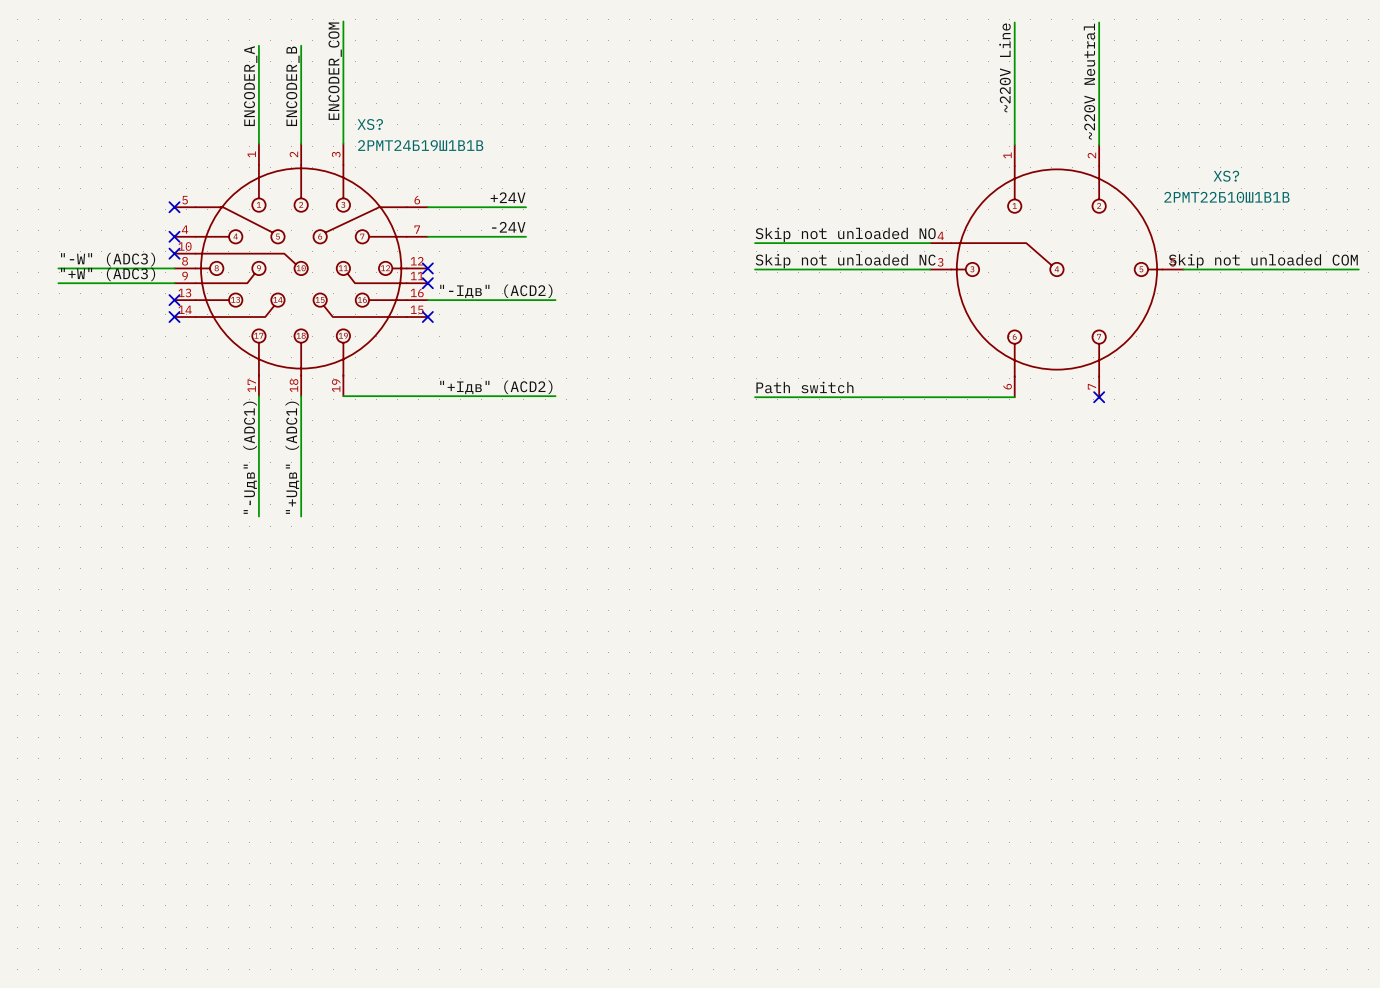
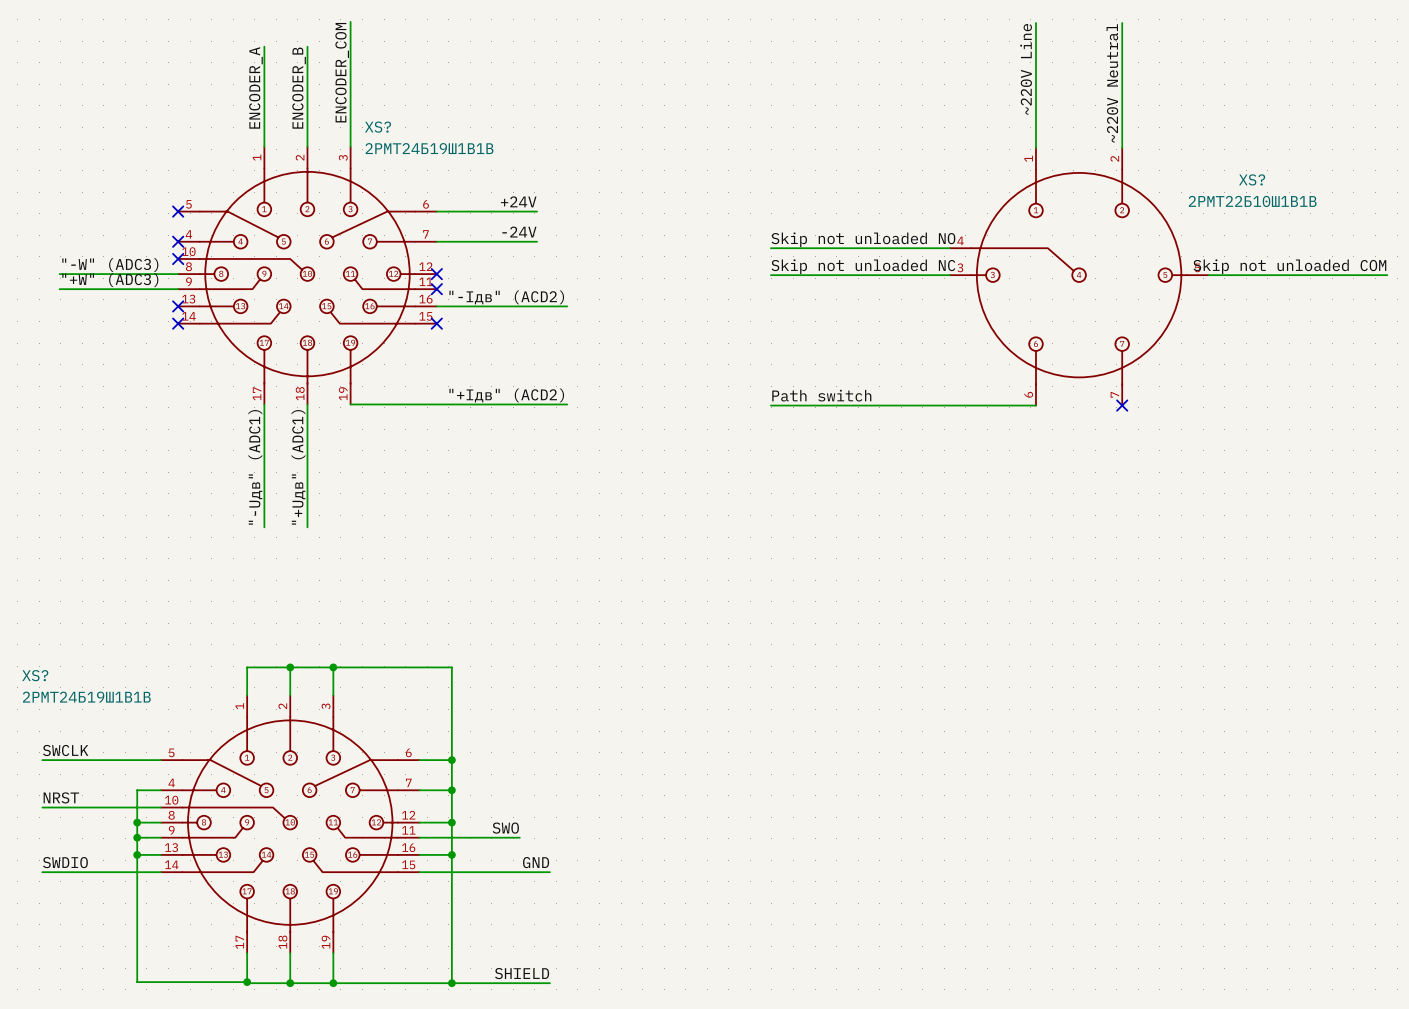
wire: none -> (290, 667) (290, 695)
junction: none -> (290, 667)
wire: none -> (333, 667) (333, 695)
junction: none -> (333, 667)
wire: none -> (247, 695) (247, 667) (451, 667) (451, 983)
label: none -> SWCLK (65, 750)
wire: none -> (42, 760) (160, 760)
wire: none -> (419, 760) (451, 760)
junction: none -> (451, 760)
wire: none -> (160, 790) (137, 790) (137, 982) (247, 982)
wire: none -> (419, 790) (451, 790)
junction: none -> (451, 790)
label: none -> NRST (61, 797)
wire: none -> (42, 807) (160, 807)
wire: none -> (137, 822) (160, 822)
junction: none -> (137, 822)
wire: none -> (419, 822) (451, 822)
junction: none -> (451, 822)
XS?: none -> 2РМТ24Б19Ш1В1В (290, 824)
label: none -> SWO (505, 828)
wire: none -> (137, 837) (160, 837)
junction: none -> (137, 837)
wire: none -> (419, 837) (519, 837)
wire: none -> (137, 854) (160, 854)
junction: none -> (137, 854)
wire: none -> (419, 854) (451, 854)
junction: none -> (451, 854)
label: none -> SWDIO (65, 862)
label: none -> GND (536, 862)
wire: none -> (42, 872) (160, 872)
wire: none -> (419, 872) (549, 872)
wire: none -> (247, 953) (247, 983) (549, 983)
wire: none -> (290, 953) (290, 983)
wire: none -> (333, 953) (333, 983)
label: none -> SHIELD (522, 973)
junction: none -> (247, 982)
junction: none -> (290, 983)
junction: none -> (333, 983)
junction: none -> (451, 983)

